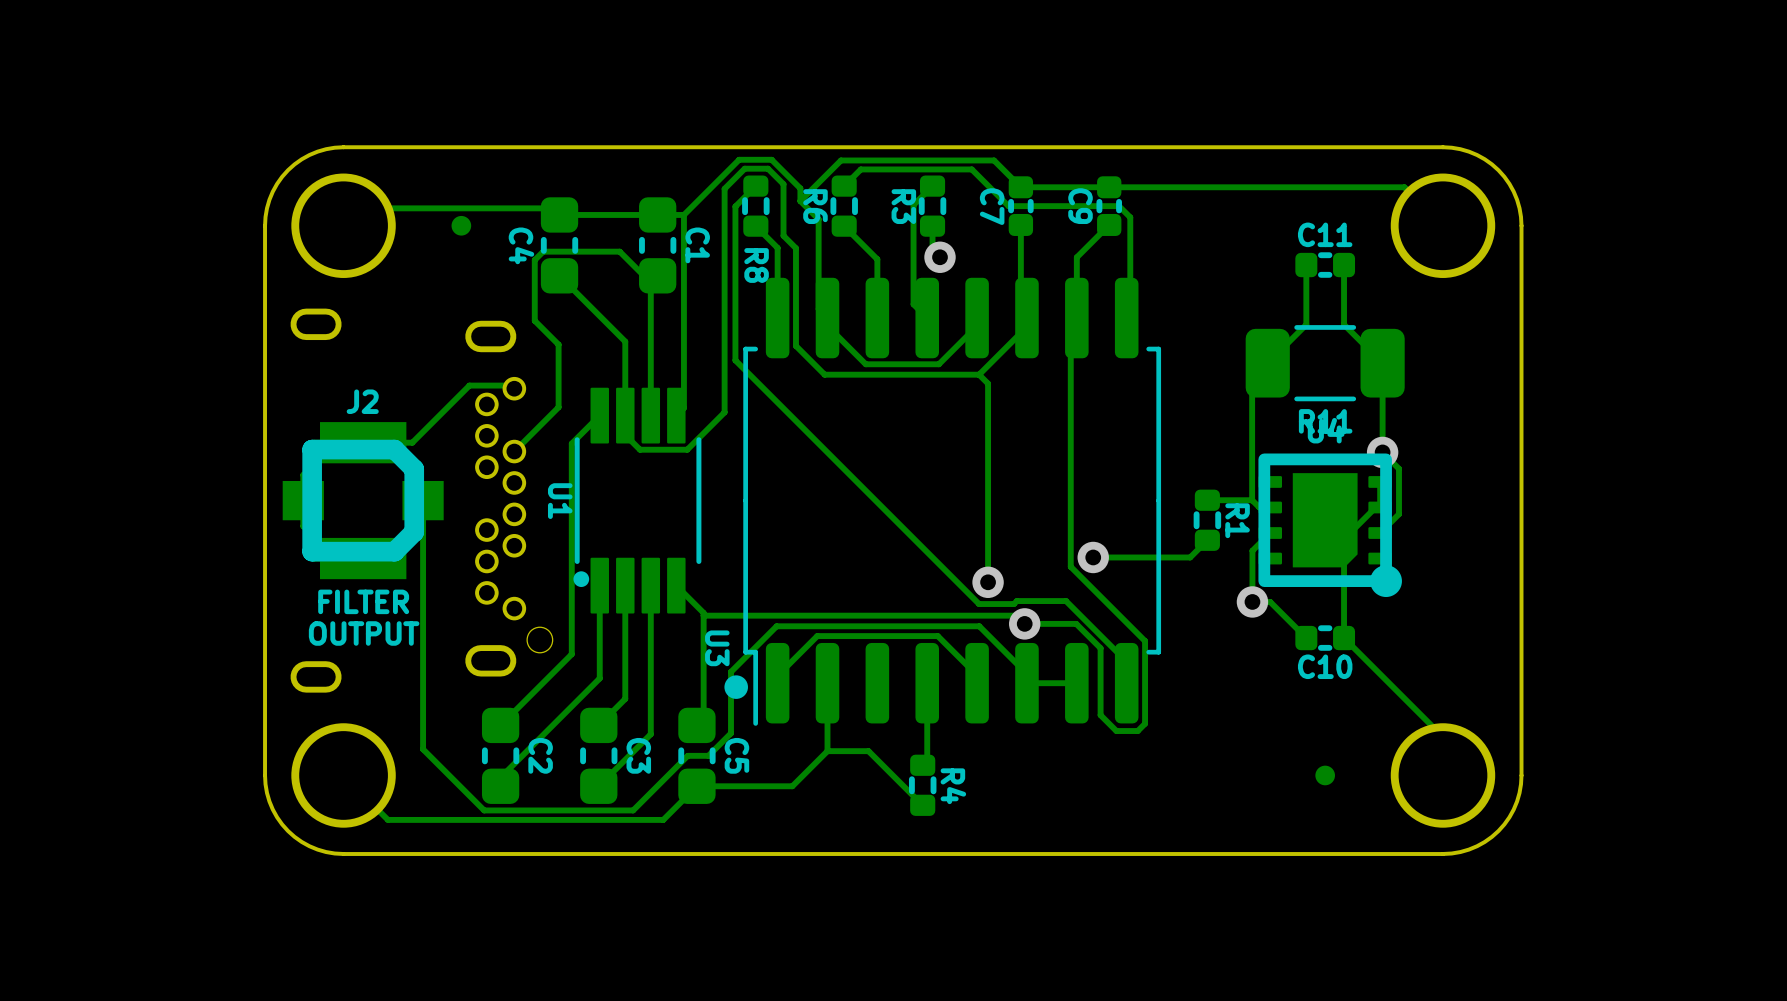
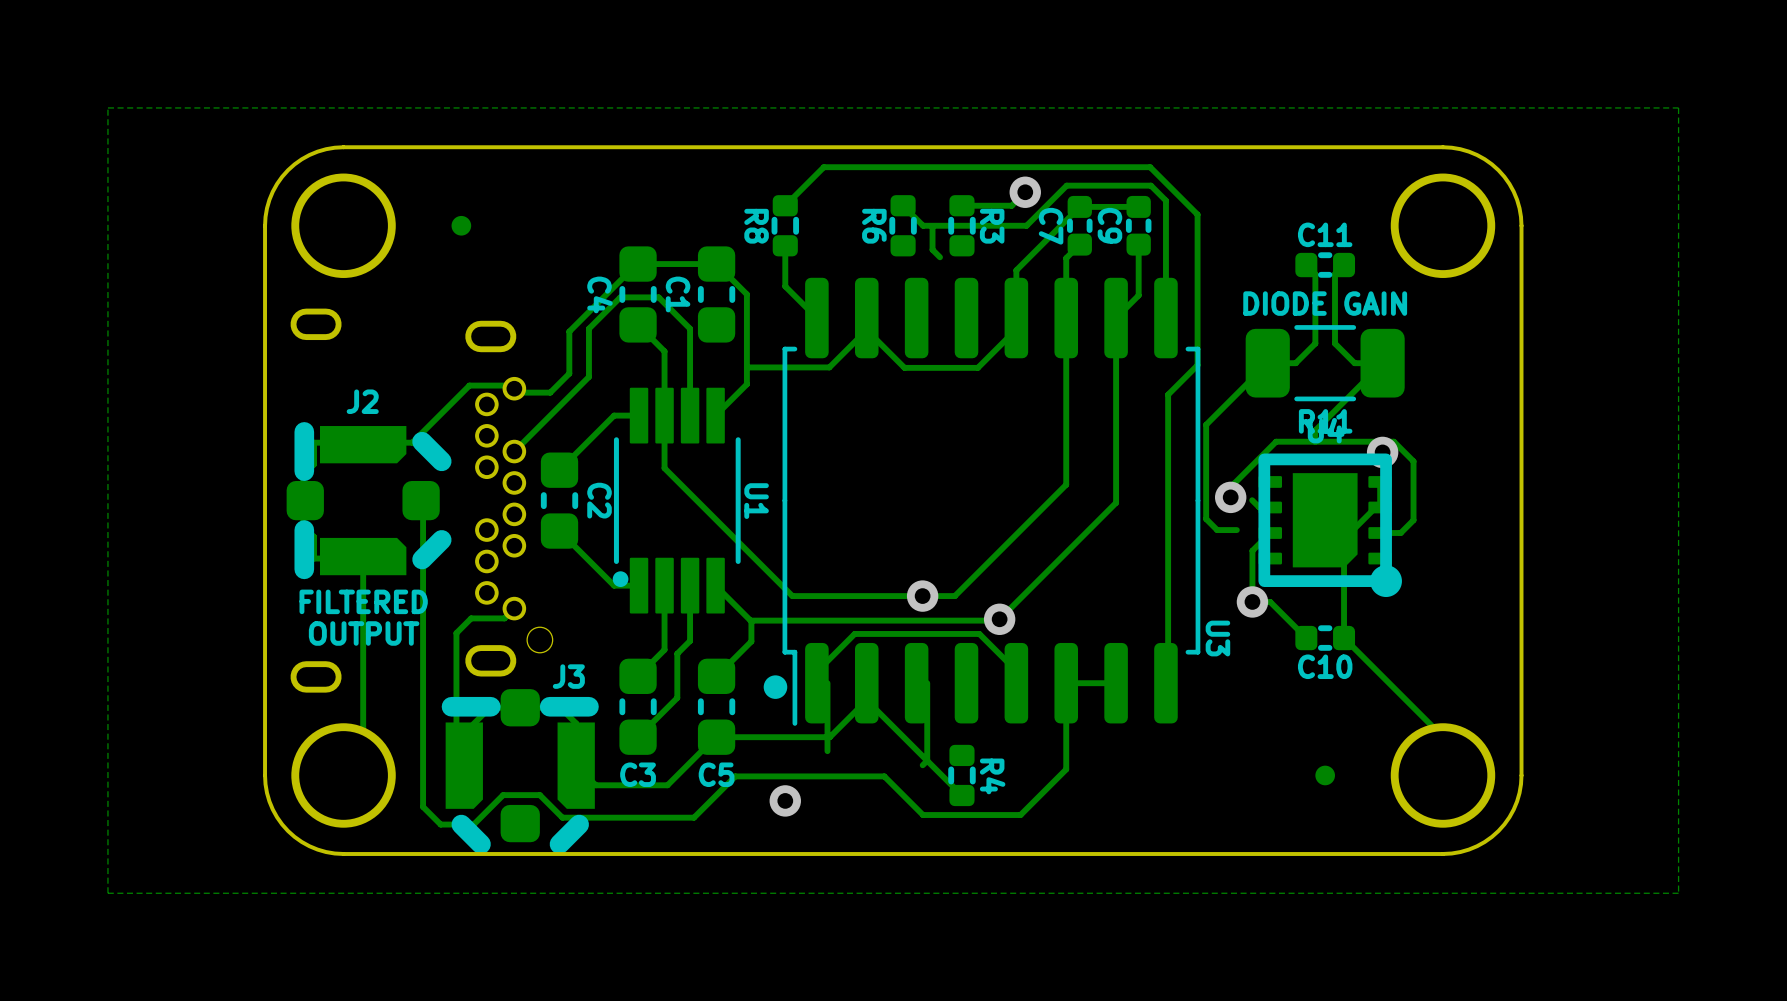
zone outline: none -> (1678, 107) (1678, 893) (107, 893) (107, 107) (1678, 107)
track: (755, 186) (735, 206) (735, 360) (979, 604) (1013, 604) (1016, 601) (1066, 601) (1126, 661) (1126, 683) -> none
track: (844, 186) (860, 169) (971, 169) (1008, 206) (1119, 206) (1130, 217) (1130, 314) (1126, 318) -> none
track: (932, 186) (913, 205) (913, 304) (927, 318) -> none
track: none -> (1025, 192) (1011, 205) (961, 205)
track: (800, 201) (818, 219) (818, 309) (827, 318) (827, 325) (865, 364) (938, 364) (977, 326) (977, 318) -> none
track: (800, 201) (800, 188) (771, 159) (739, 159) (683, 214) -> none
track: (800, 201) (841, 160) (994, 160) (1020, 187) (1404, 187) (1442, 225) -> none
track: none -> (785, 205) (823, 167) (1150, 167) (1197, 214) (1197, 365) (1168, 394) (1168, 681) (1165, 683)
track: none -> (903, 205) (923, 225) (1026, 225) (1066, 185) (1150, 185) (1165, 200) (1165, 318)
R8 position: (755, 206) -> (785, 225)
R6 position: (844, 206) -> (903, 225)
R3 name position: R3 (903, 206) -> R3 (992, 226)
R3 position: (932, 206) -> (961, 225)
C7 position: (1020, 206) -> (1079, 225)
C9 position: (1109, 206) -> (1138, 225)
track: none -> (1138, 206) (1079, 206) (1016, 270) (1016, 329) (977, 367) (904, 367) (866, 330)
track: (683, 214) (683, 407) (676, 415) -> none
track: (683, 214) (559, 214) (552, 208) (360, 208) (343, 225) -> none
track: (1020, 224) (1020, 311) (1026, 318) (1026, 326) (979, 374) -> none
track: (1109, 224) (1076, 257) (1076, 318) (1070, 324) (1070, 566) (1145, 641) (1145, 723) (1137, 731) (1116, 731) (1100, 715) (1100, 648) (1076, 623) (1024, 623) (1016, 615) (703, 615) -> none
track: (755, 226) (777, 247) (777, 318) -> none
track: (844, 226) (877, 259) (877, 318) -> none
track: none -> (1079, 244) (1066, 258) (1066, 484) (954, 596) (792, 596) (664, 468) (664, 351) (638, 324)
track: none -> (1138, 244) (1138, 295) (1116, 318) (1116, 502) (998, 620) (750, 620)
C4 position: (559, 245) -> (638, 294)
C1 position: (657, 245) -> (716, 294)
C1 name position: C1 (697, 245) -> C1 (678, 294)
track: none -> (785, 245) (785, 286) (816, 318)
via position: (940, 257) -> (1025, 192)
R8 name position: R8 (756, 265) -> R8 (756, 226)
track: (1306, 265) (1306, 324) (1267, 363) -> (1306, 265) (1315, 274) (1315, 343) (1295, 363) (1267, 363)
track: (1344, 265) (1344, 324) (1382, 363) (1382, 452) (1398, 468) (1398, 514) (1380, 533) -> (1344, 265) (1335, 274) (1335, 343) (1354, 363) (1382, 363) (1315, 430) (1315, 441)
track: (559, 275) (625, 341) (625, 434) (640, 449) (687, 449) (724, 412) (724, 188) (744, 168) (768, 168) (783, 184) (783, 235) (795, 248) (795, 345) (824, 374) (979, 374) -> none
track: (650, 282) (619, 251) (543, 251) (534, 260) (534, 320) (558, 344) (558, 407) -> (690, 415) (690, 328) (658, 297) (620, 297) (588, 328) (588, 376) (558, 407)
track: (650, 282) (650, 415) -> none
text: none -> DIODE GAIN (1325, 303)
track: none -> (866, 330) (829, 367) (746, 367)
track: (979, 374) (988, 383) (988, 582) -> none
track: (1252, 378) (1252, 500) (1207, 500) -> (1252, 378) (1206, 424) (1206, 519) (1217, 530) (1236, 530)
track: none -> (514, 388) (518, 392) (550, 392) (569, 373) (569, 331) (636, 264) (716, 264) (746, 294) (746, 384) (715, 415)
track: (599, 415) (571, 443) (571, 654) (500, 725) -> none
track: none -> (639, 415) (614, 415) (559, 470)
J2 footprint: [282, 422, 444, 580] -> [286, 422, 452, 580]
track: none -> (1230, 497) (1230, 487) (1276, 441) (1393, 441) (1413, 461) (1413, 520) (1400, 533) (1380, 533)
via: none -> (1230, 497)
U1 position: (637, 500) -> (676, 500)
U1 name position: U1 (560, 501) -> U1 (756, 501)
U3 position: (942, 501) -> (982, 501)
R1: (1207, 520) -> none
track: none -> (559, 531) (614, 585) (639, 585)
track: (1207, 540) (1190, 557) (1093, 557) -> none
via: (1093, 557) -> none
via: (988, 582) -> none
track: (599, 585) (599, 678) (500, 777) (500, 786) -> none
track: (625, 585) (625, 698) (598, 725) -> none
track: (650, 585) (650, 734) (598, 786) -> none
track: none -> (664, 585) (664, 649) (638, 676)
track: (676, 585) (703, 612) (703, 718) (696, 725) -> none
track: none -> (690, 585) (690, 640) (677, 653) (677, 697) (638, 737)
track: none -> (715, 585) (751, 621) (751, 641) (716, 676)
via: none -> (922, 596)
text: FILTER (363, 601) -> FILTERED (363, 601)
track: none -> (514, 608) (504, 618) (471, 618) (456, 633) (456, 757) (464, 765) (464, 733) (489, 707) (560, 707) (576, 723) (576, 765) (595, 785) (667, 785) (715, 737) (829, 737) (866, 700)
via position: (1024, 623) -> (999, 619)
U3 name position: U3 (717, 648) -> U3 (1217, 638)
track: (977, 683) (977, 675) (937, 636) (817, 636) (777, 675) (777, 683) -> none
track: none -> (1016, 683) (1016, 670) (979, 633) (854, 633) (816, 671) (816, 683)
track: (1066, 683) (1026, 683) (1026, 673) (979, 626) (776, 626) (731, 671) (731, 733) (708, 755) (687, 755) (633, 810) (484, 810) (423, 749) -> (1066, 683) (1066, 769) (1020, 815) (923, 815) (884, 776) (735, 776) (694, 817) (562, 817) (539, 795) (503, 795) (473, 824) (440, 824) (423, 806) (423, 749)
track: none -> (1116, 683) (1076, 683)
track: none -> (866, 700) (961, 795)
C2 position: (500, 755) -> (559, 500)
C3 position: (598, 755) -> (638, 706)
C3 name rotation: 0° (638, 755) -> 90° counterclockwise (638, 774)
C5 position: (696, 755) -> (716, 706)
C5 name rotation: 0° (736, 755) -> 90° counterclockwise (716, 774)
J3: none -> (520, 771)
track: (343, 775) (388, 819) (663, 819) (696, 786) (792, 786) (827, 751) (868, 751) (922, 805) -> (343, 775) (363, 755) (363, 558)
R4 position: (922, 785) -> (961, 775)
via: none -> (785, 800)

